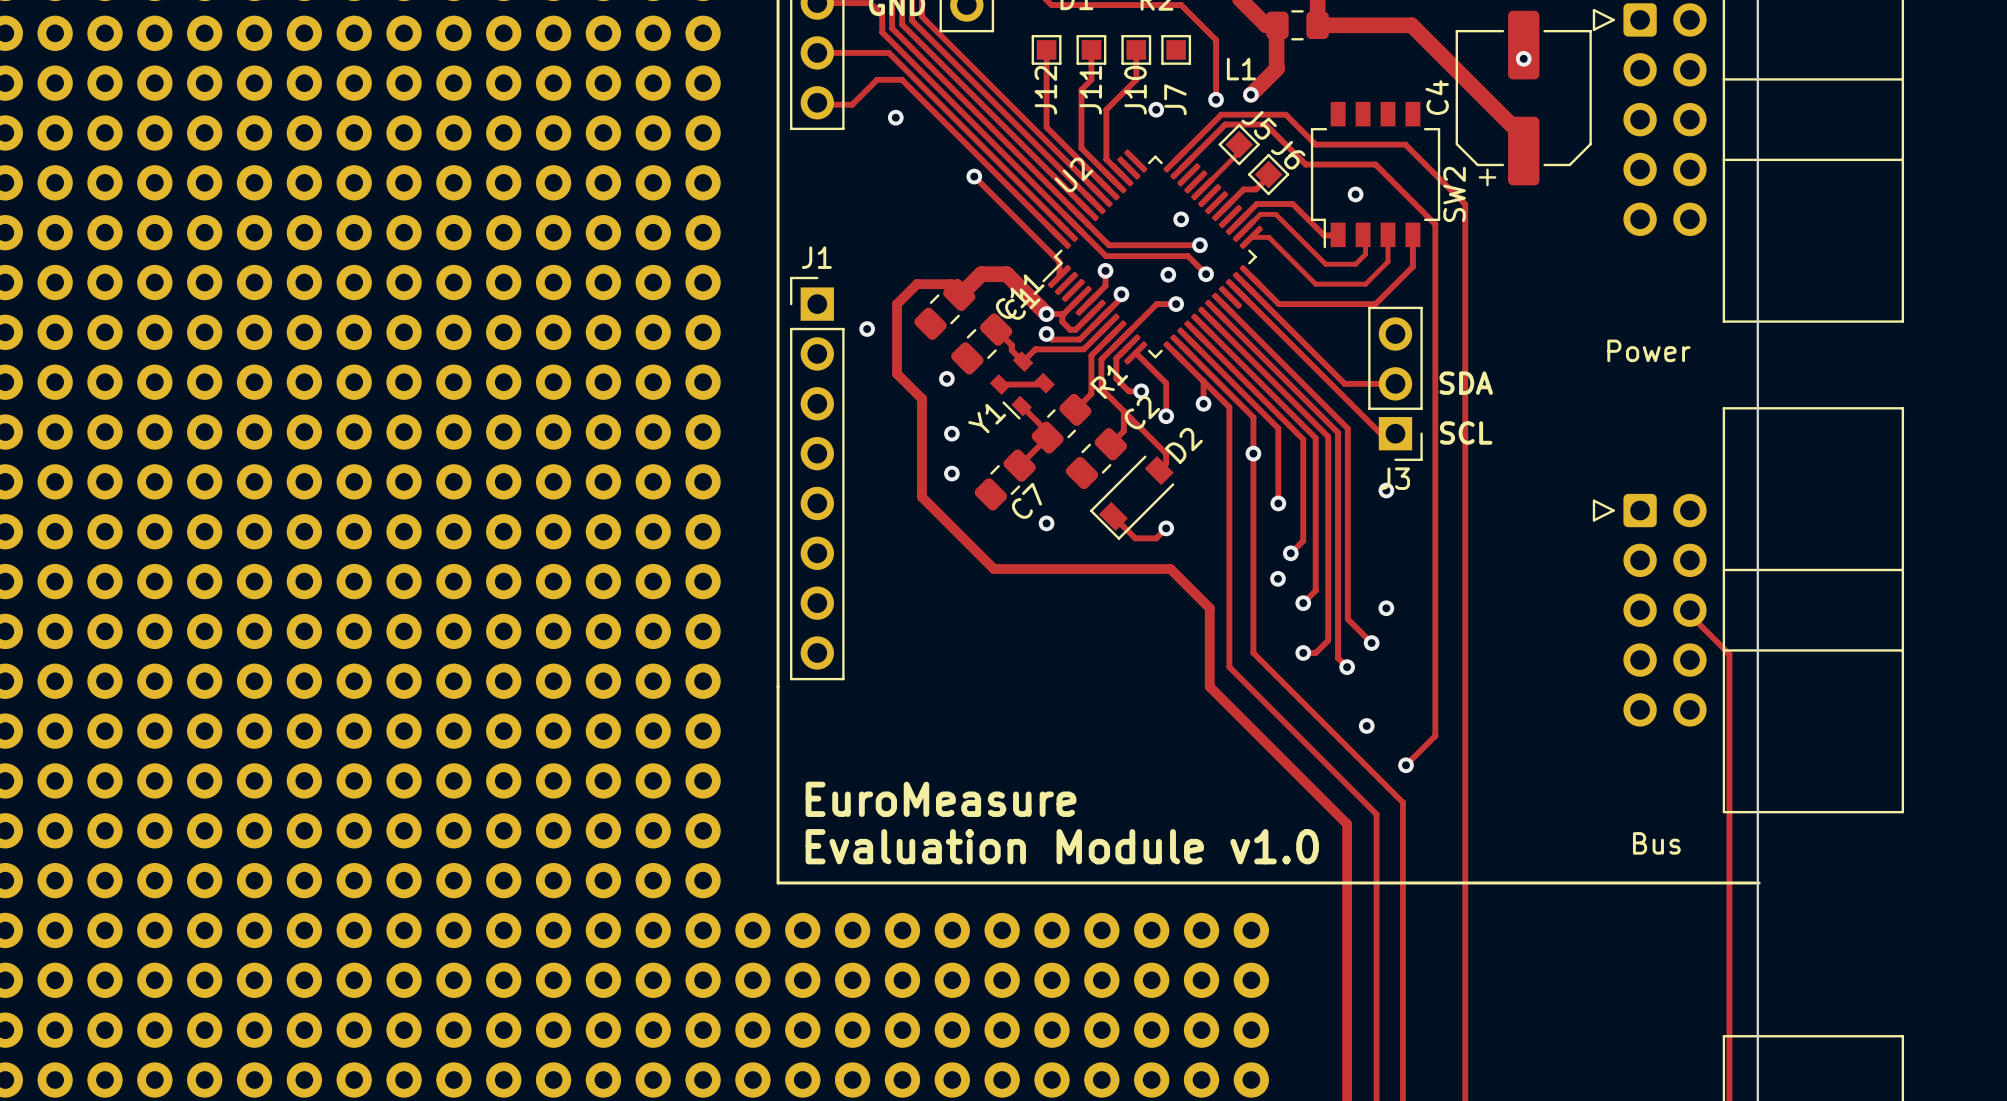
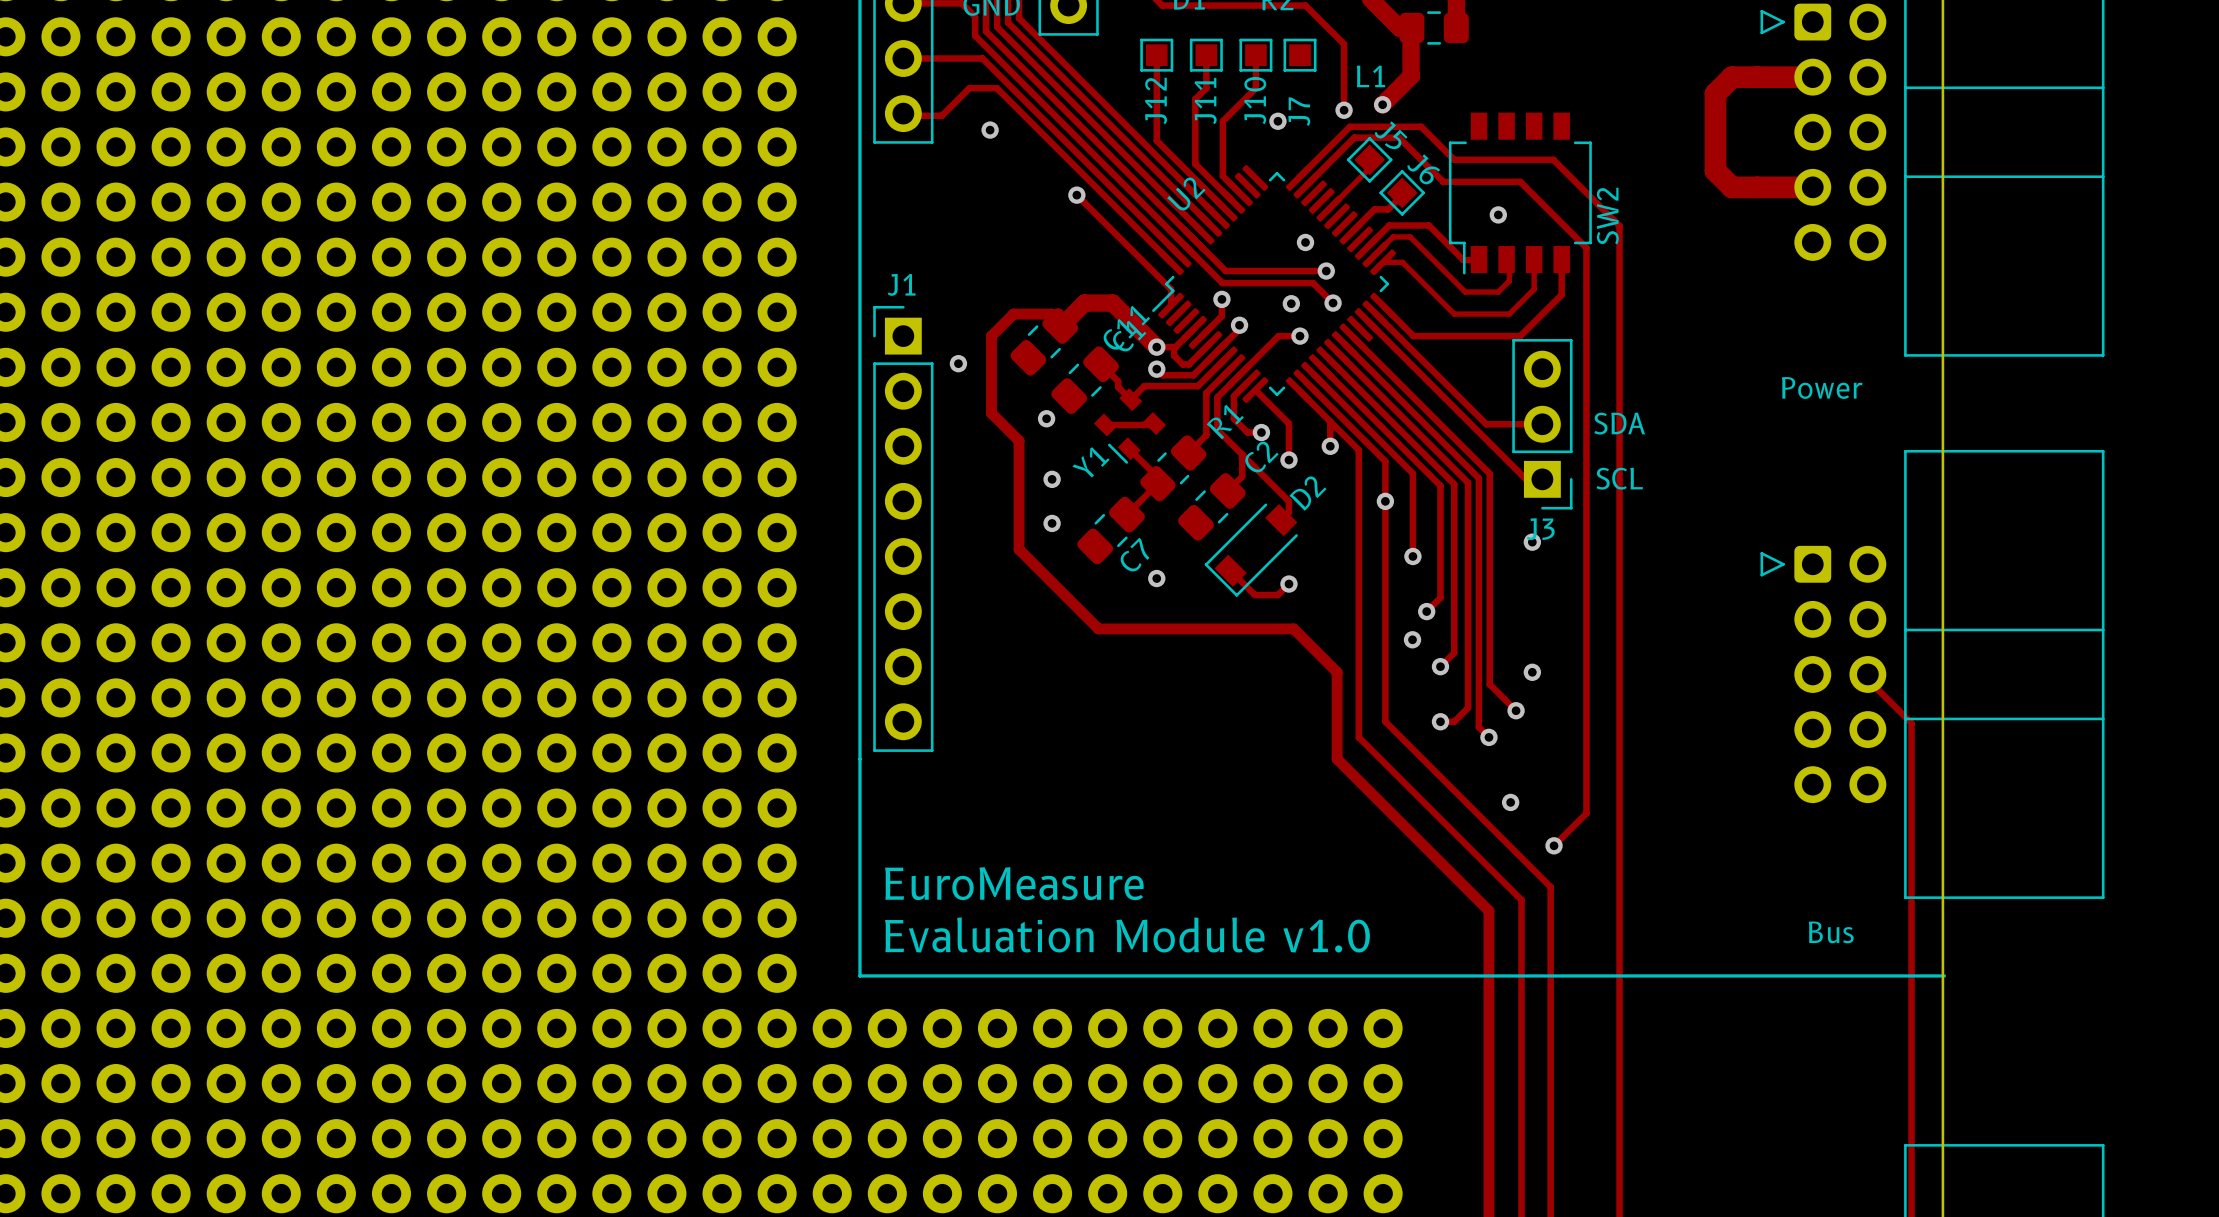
track: (1317, 25) (1411, 25) (1523, 137) (1523, 151) -> none
via: (1523, 58) -> none
track: none -> (1812, 77) (1732, 77) (1715, 93) (1715, 170) (1731, 187) (1812, 187)
C4: (1523, 98) -> none

